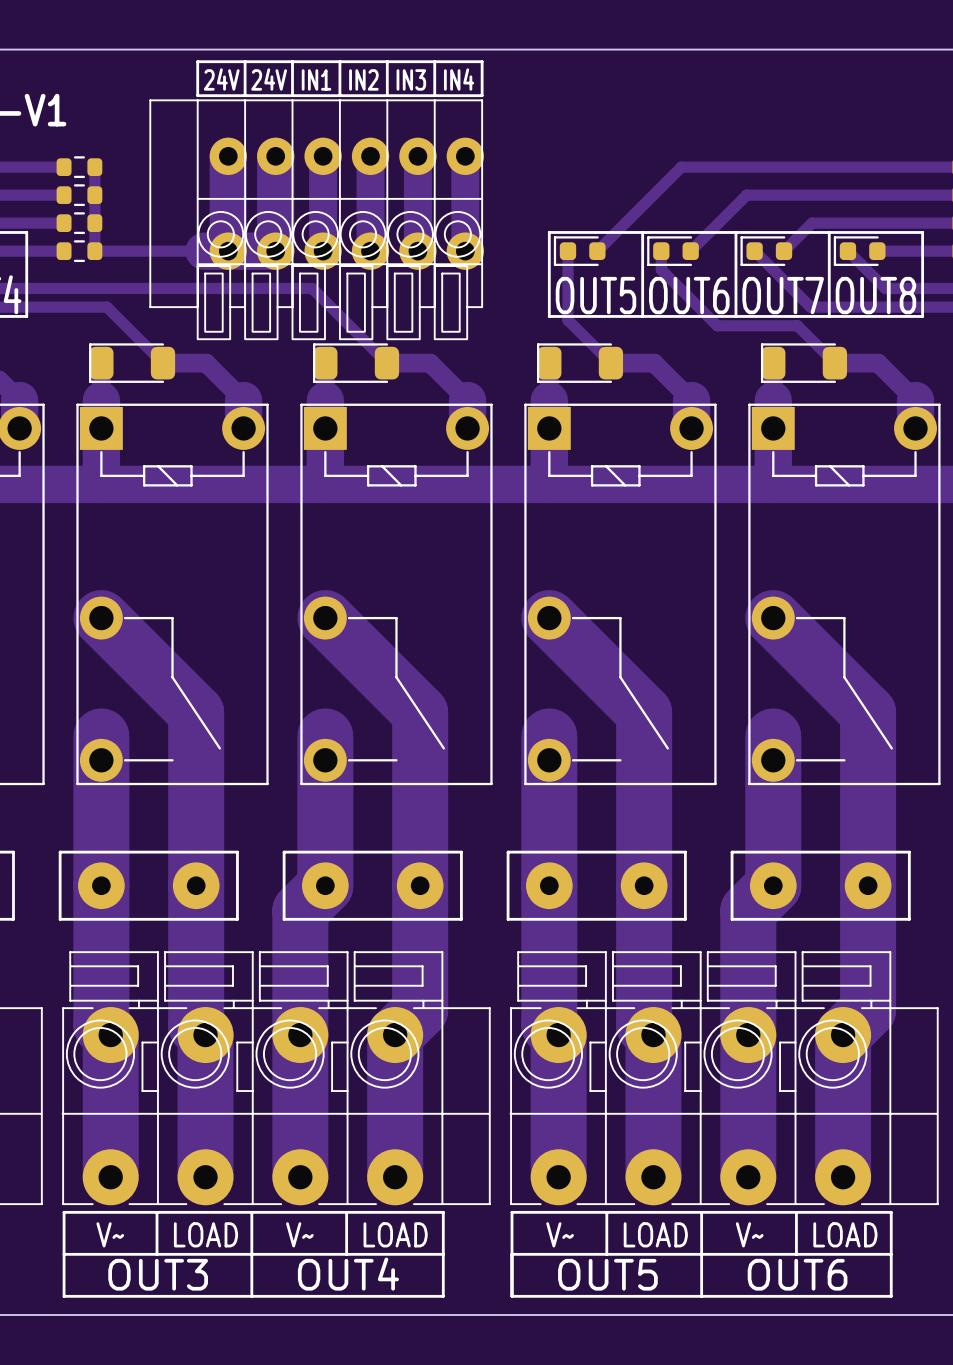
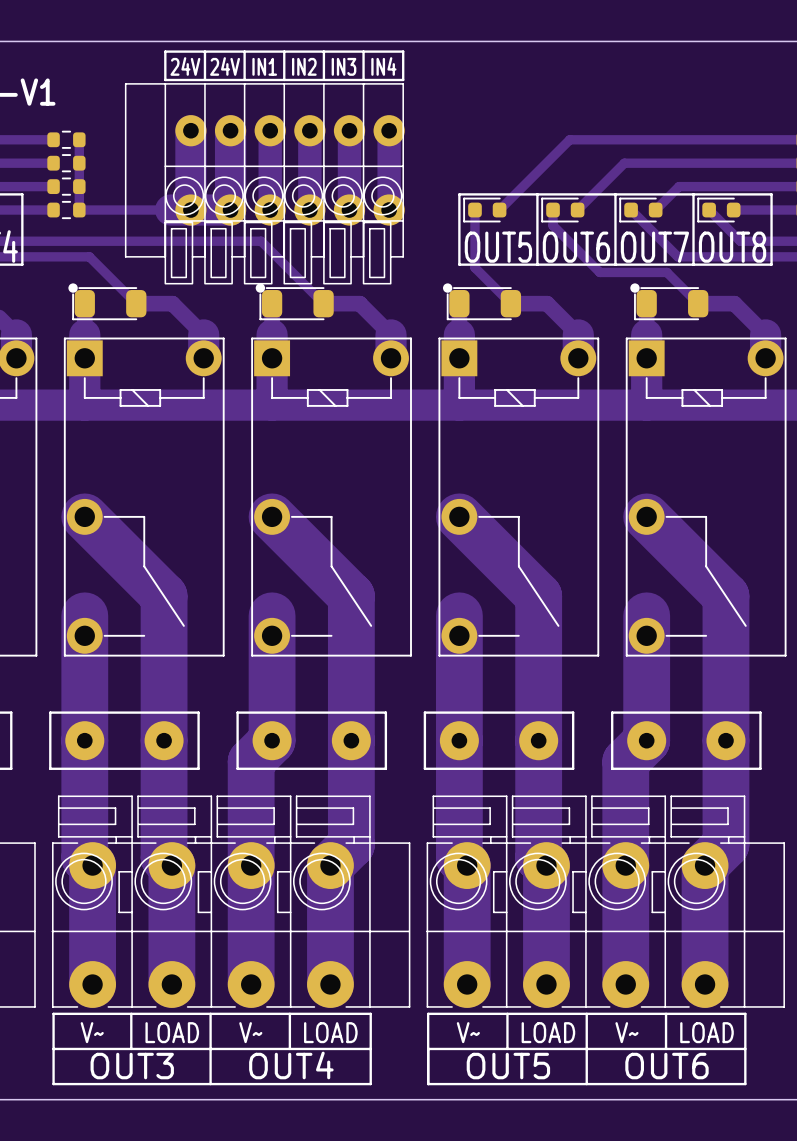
part footprint: [89, 343, 176, 383] -> [68, 283, 147, 321]
part footprint: [313, 343, 400, 383] -> [255, 283, 334, 321]
part footprint: [537, 343, 624, 383] -> [442, 283, 522, 321]
part footprint: [760, 343, 848, 383] -> [630, 283, 709, 321]

